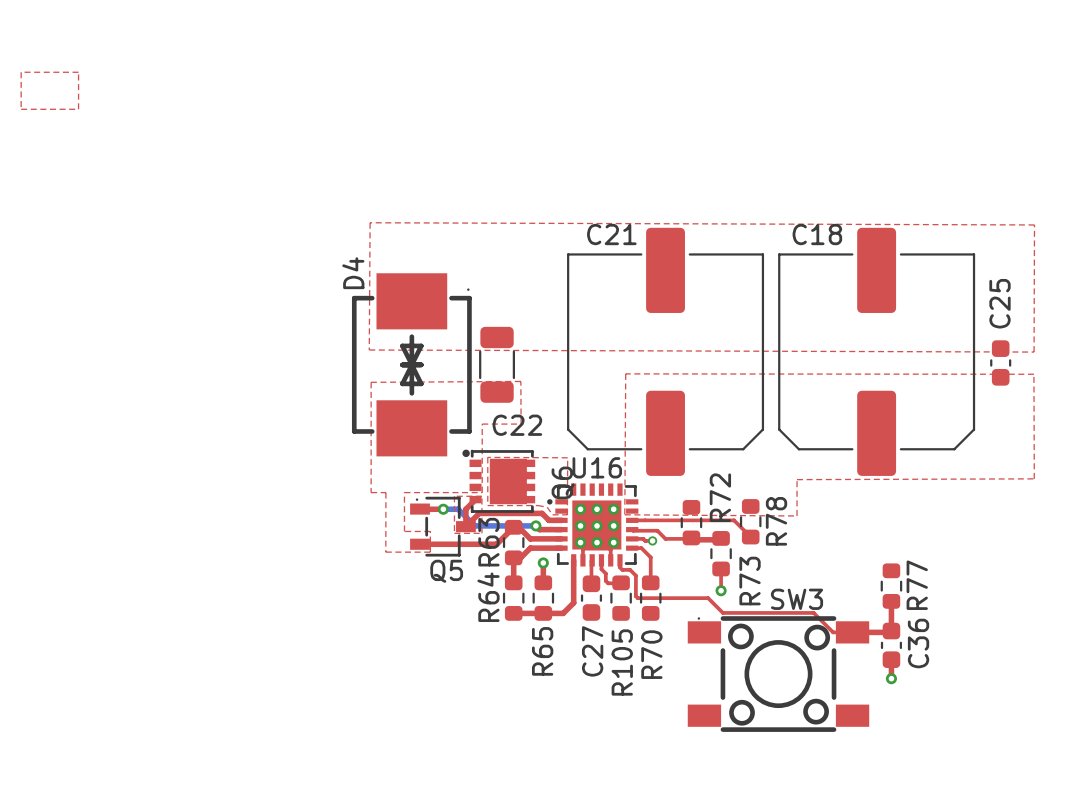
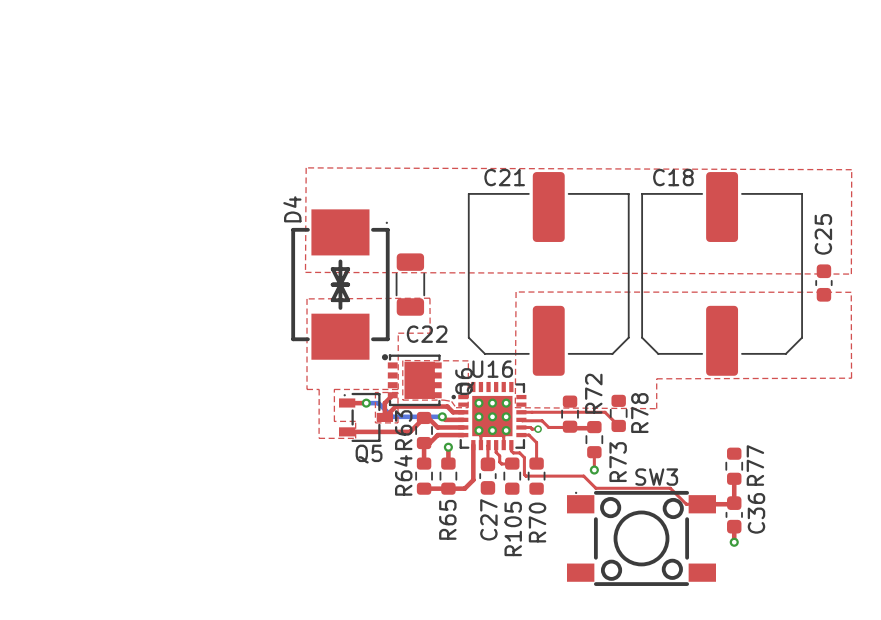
top zone outline: (21, 72) (78, 72) (78, 109) (21, 109) (21, 72) -> none

